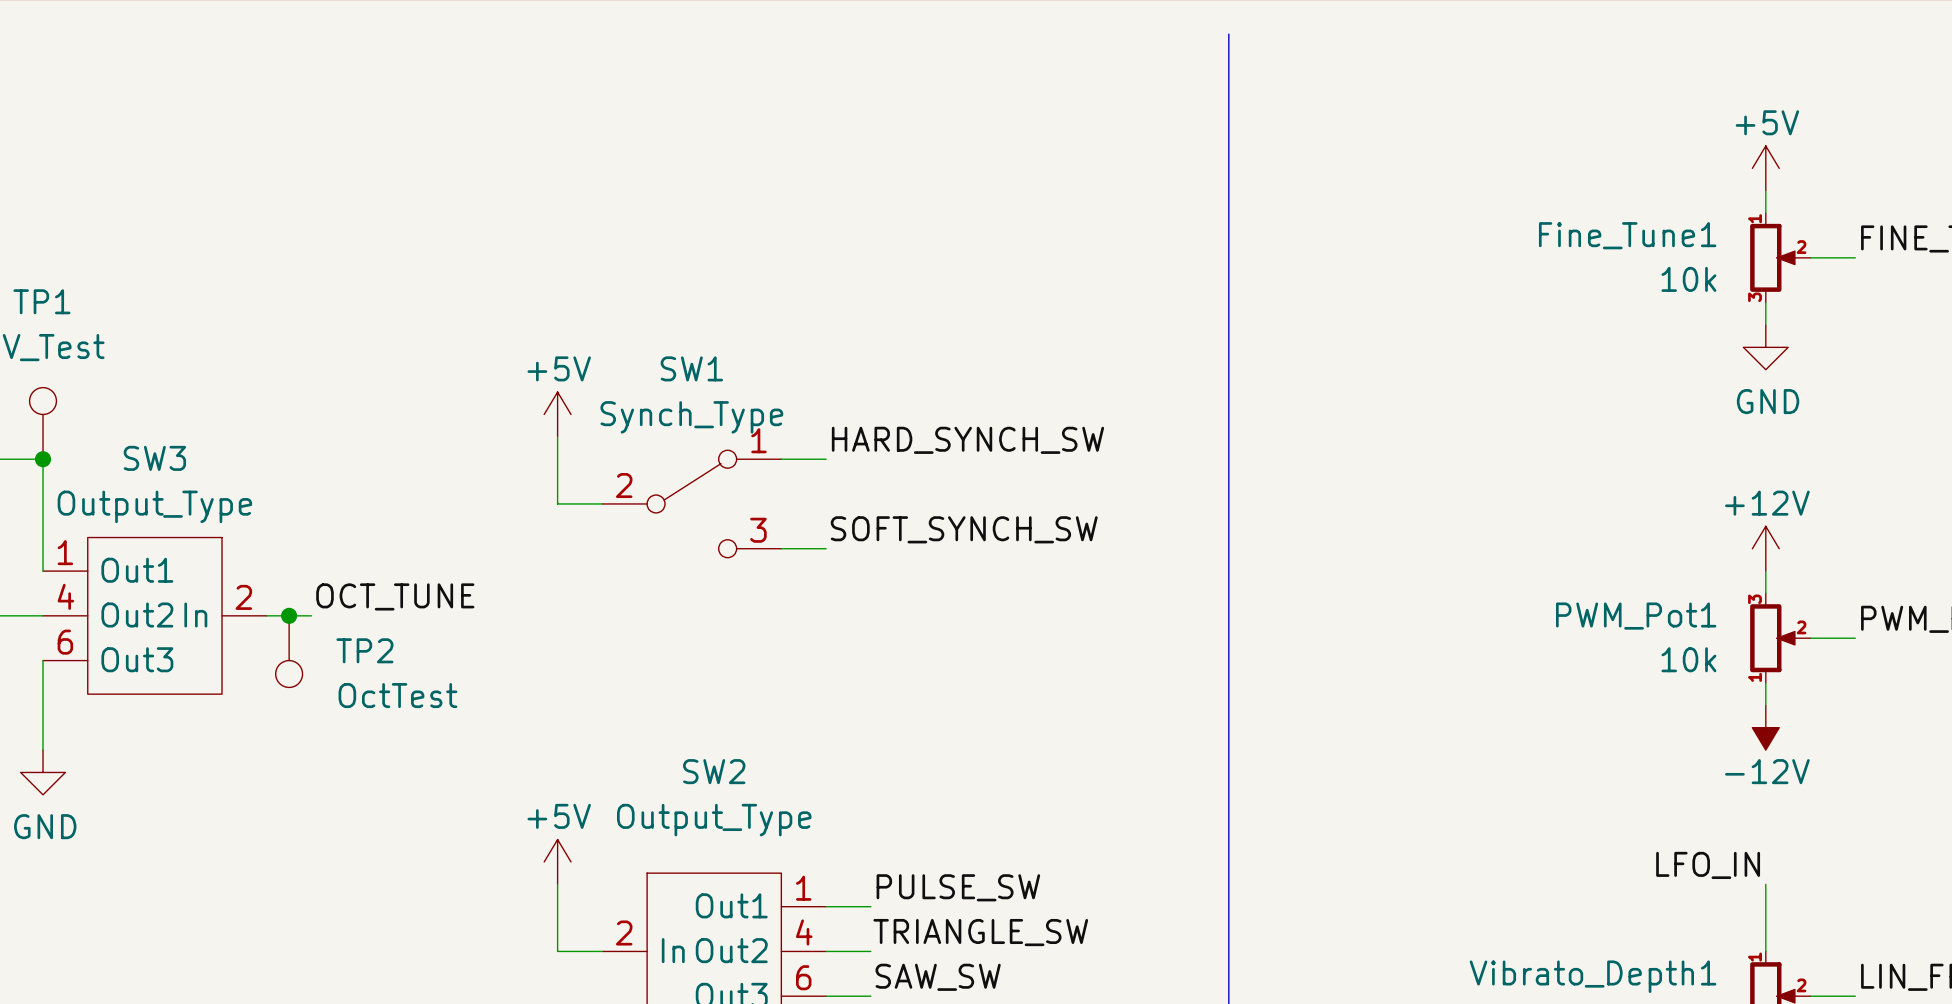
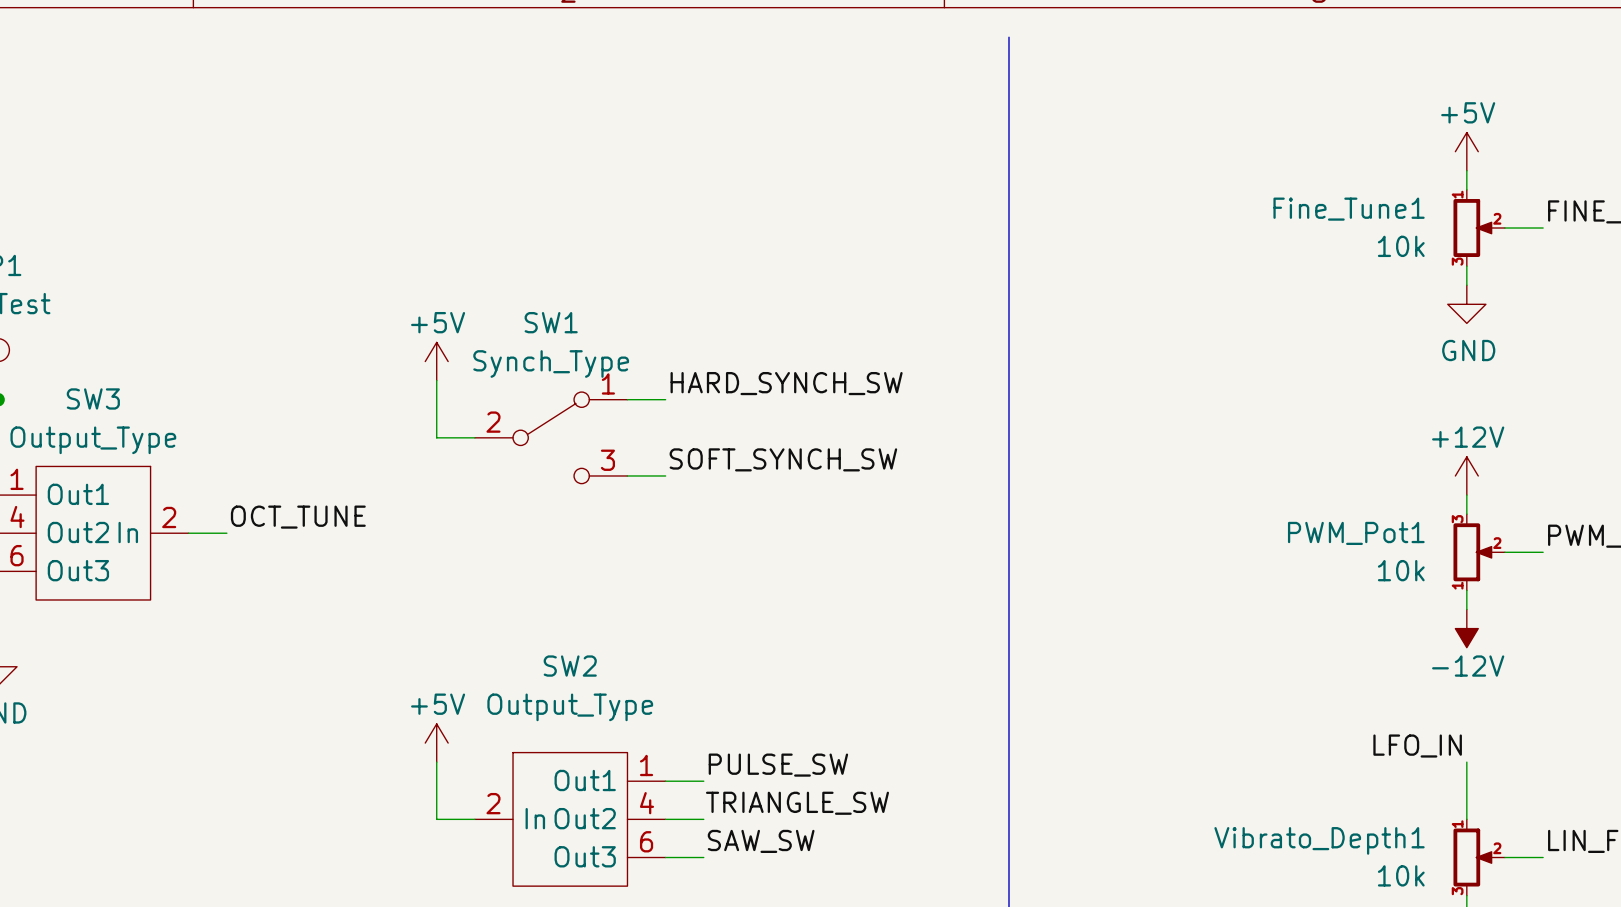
junction: (289, 615) -> none
TP2: OctTest (289, 651) -> none

